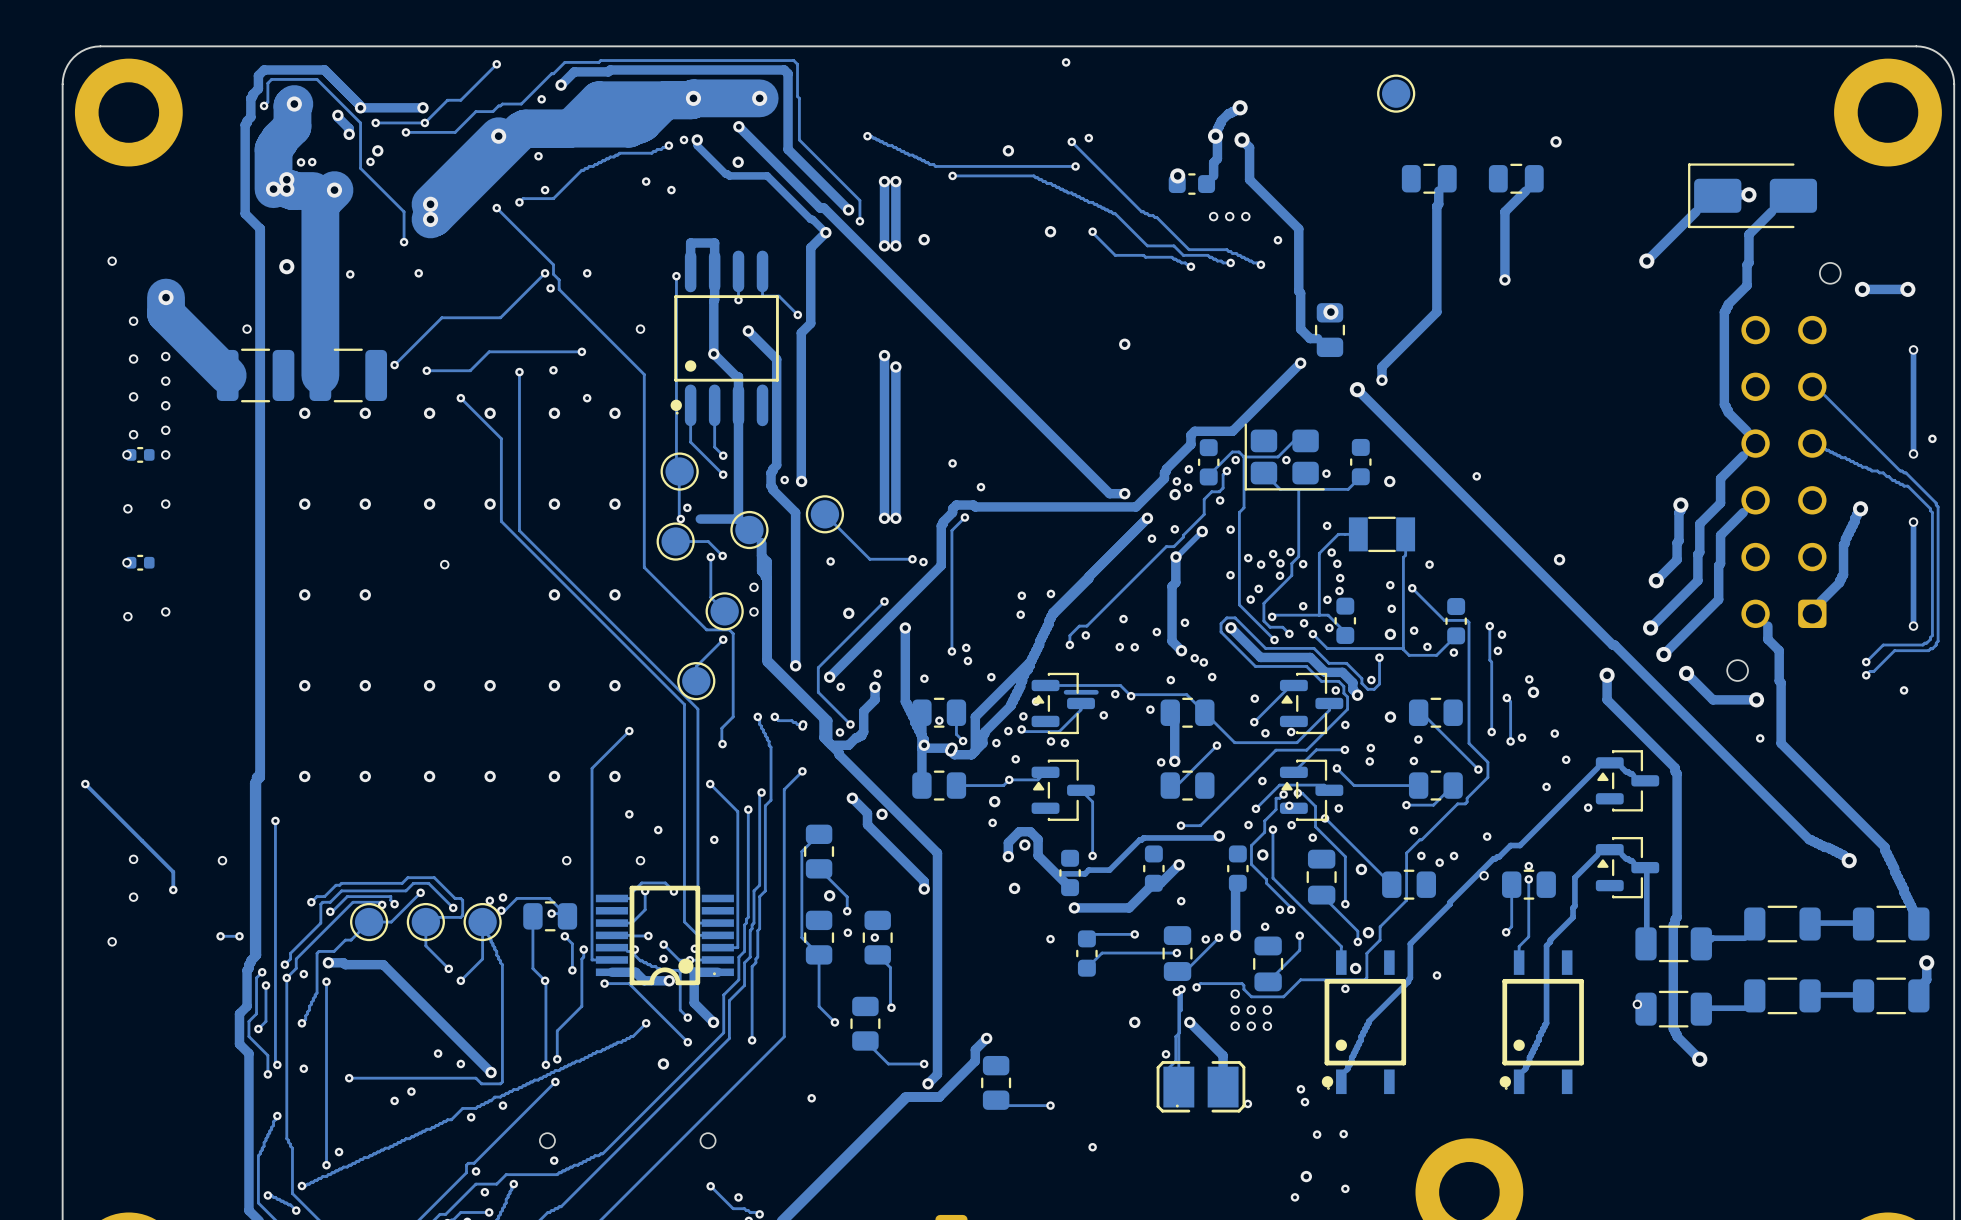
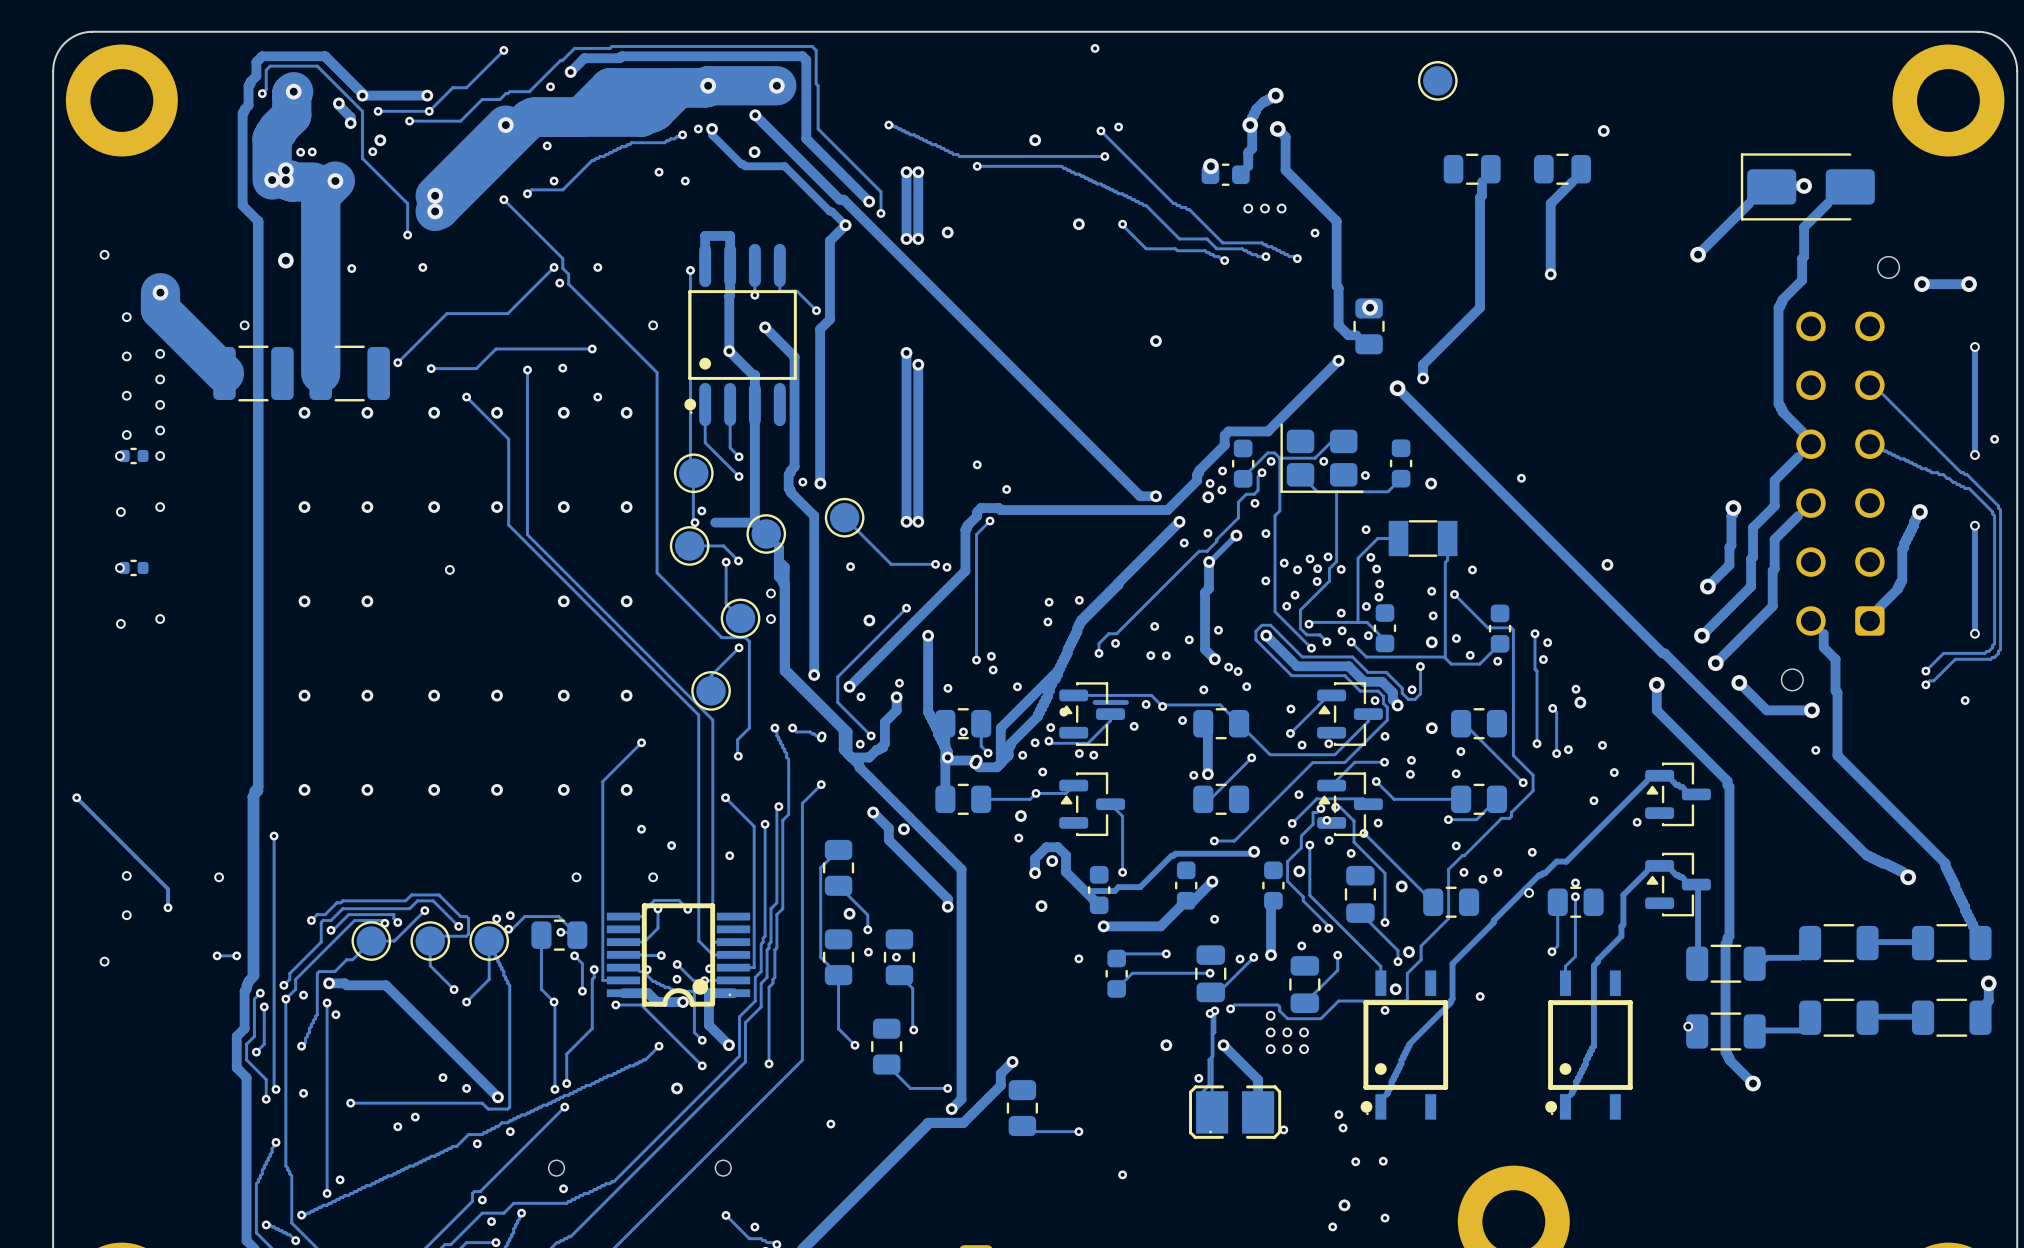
via: none -> (335, 1014)

